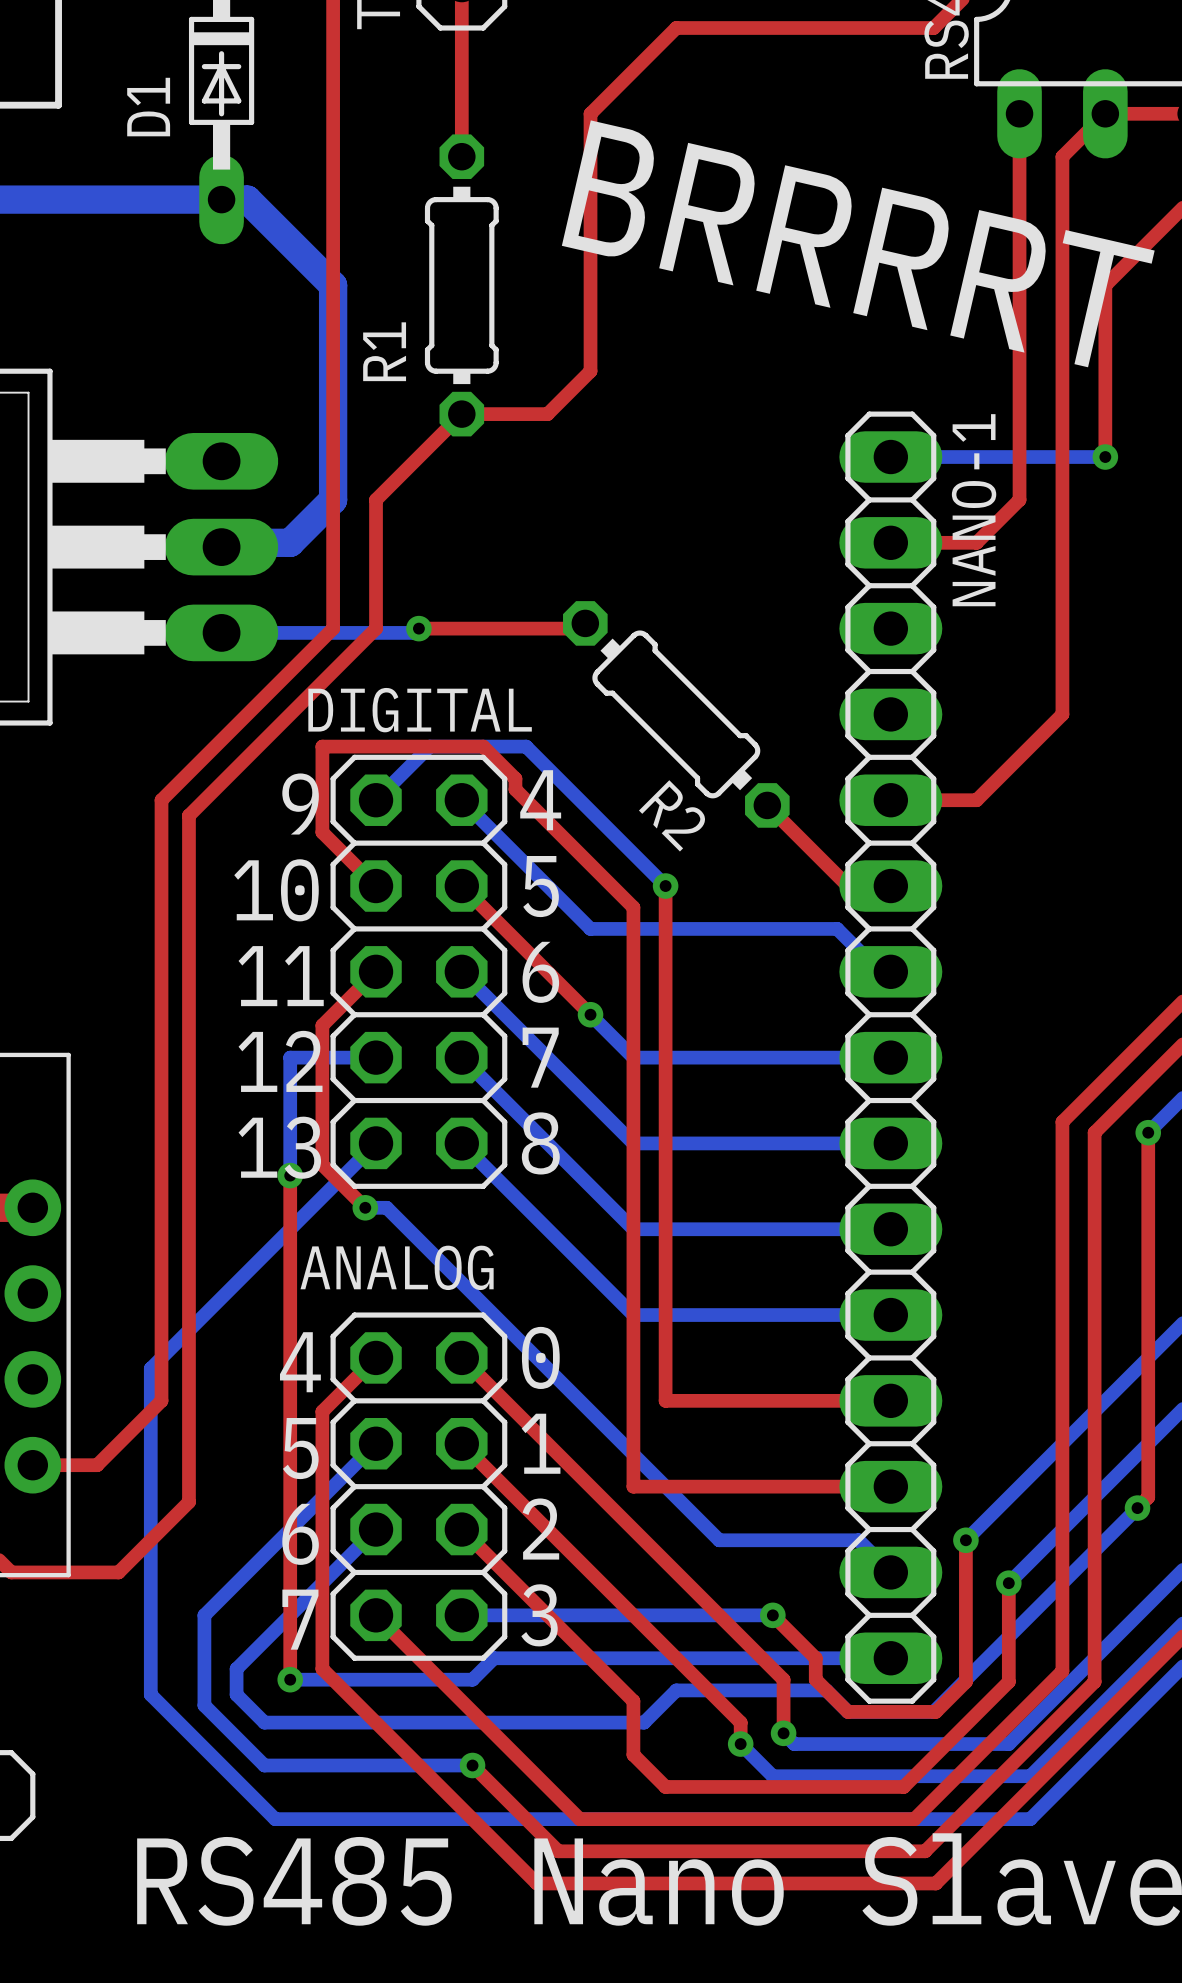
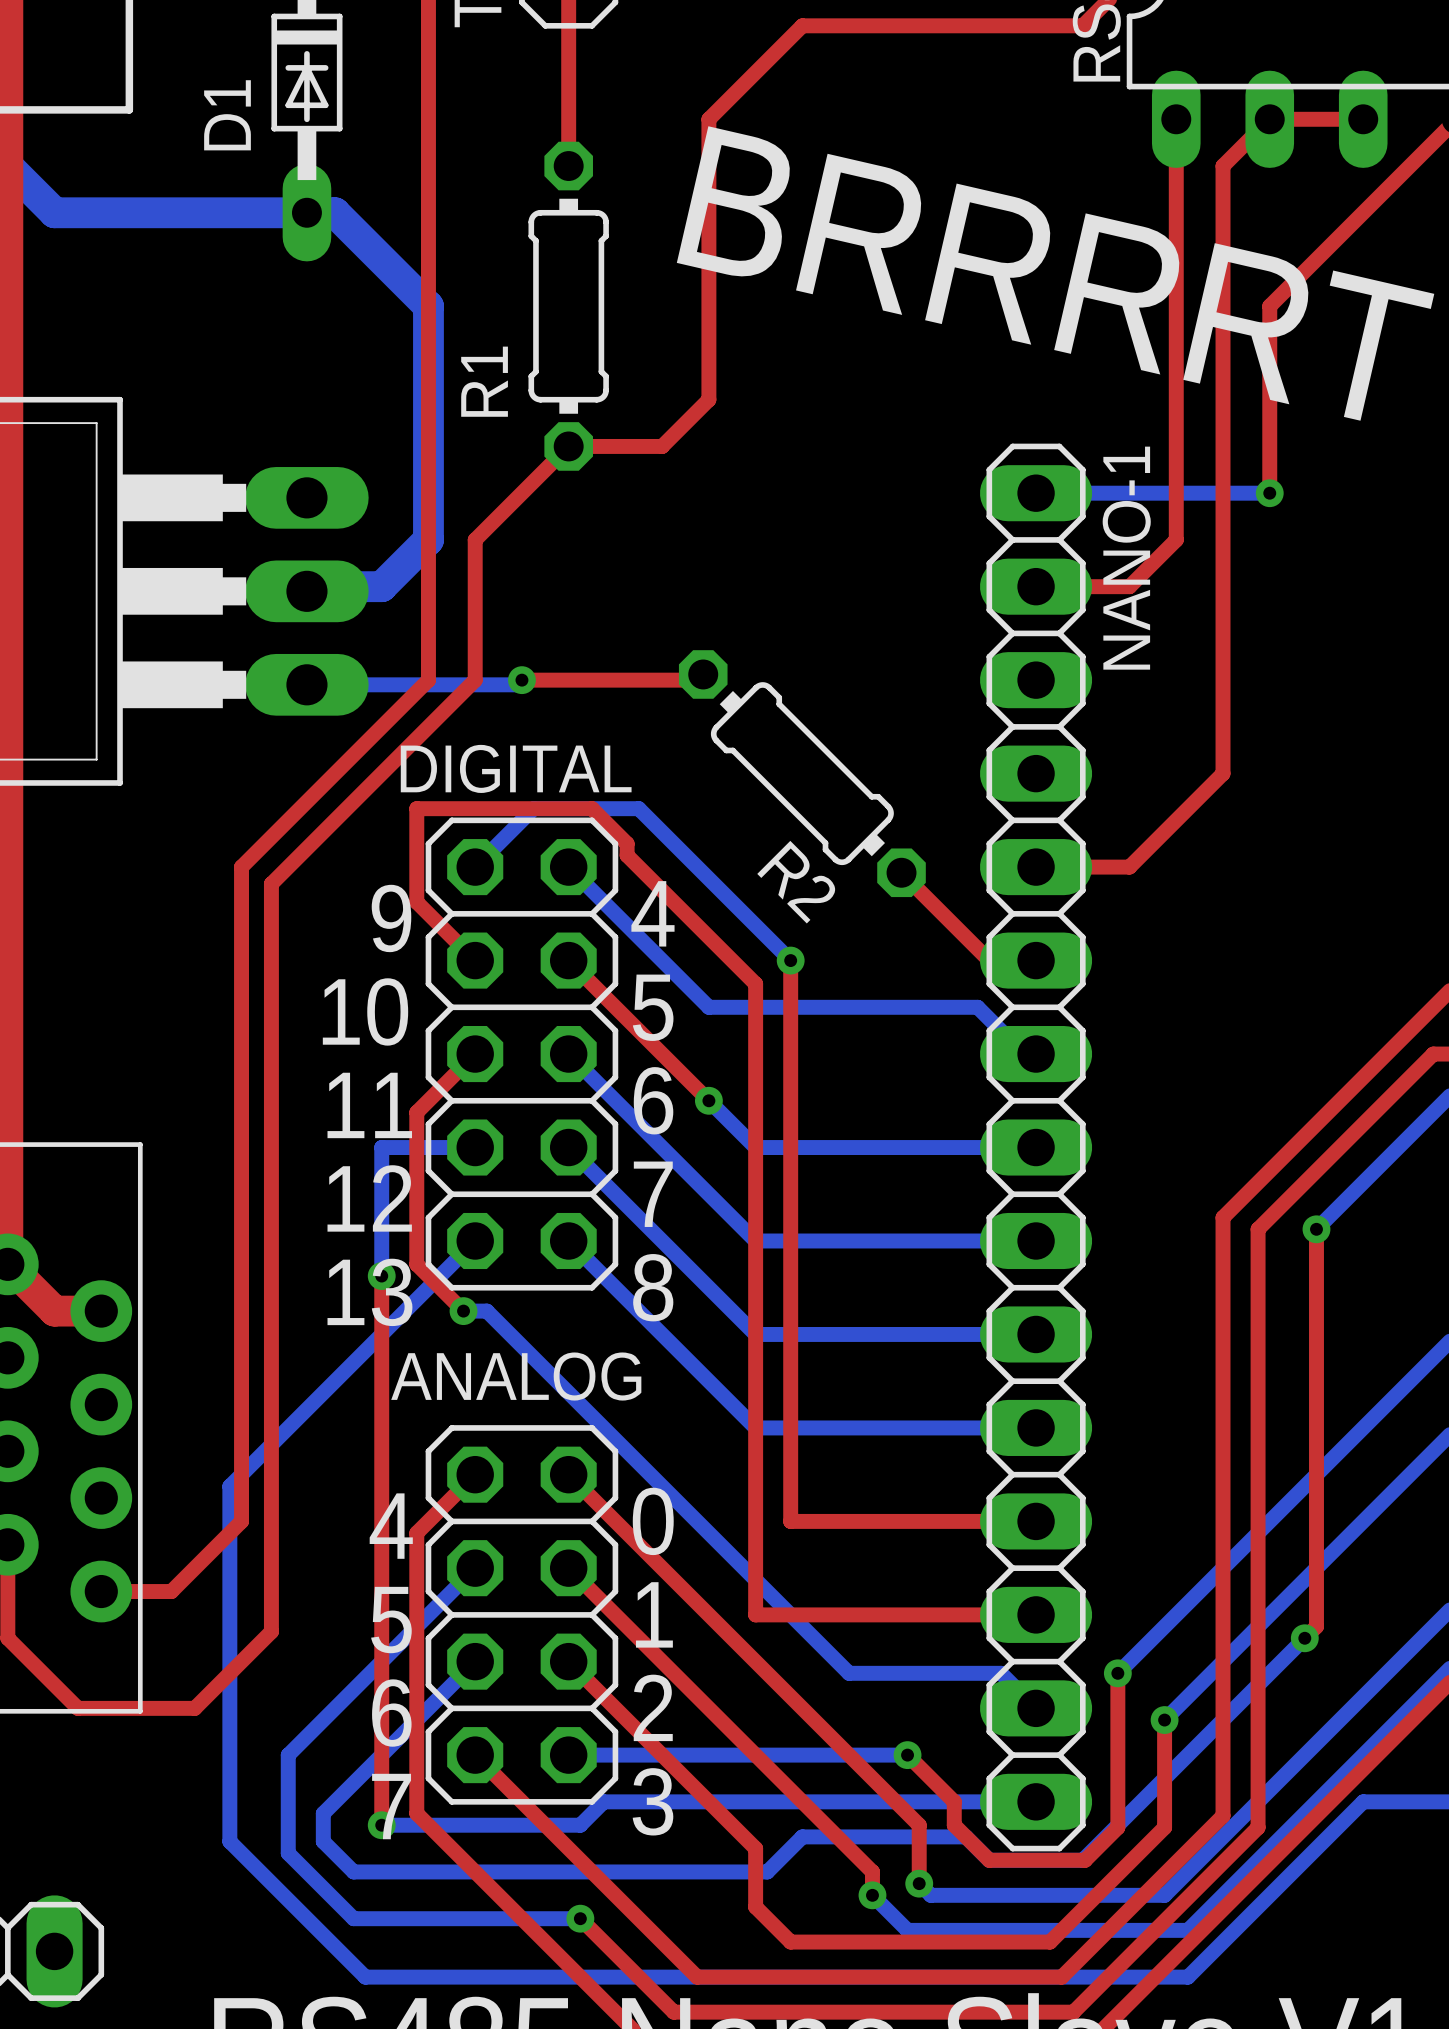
text position: 4 (540, 800) -> 4 (652, 913)
text position: 9 (300, 803) -> 9 (391, 918)
text position: 5 (541, 886) -> 5 (653, 1007)
text position: 10 (276, 890) -> 10 (365, 1011)
text position: 6 (540, 972) -> 6 (653, 1100)
text position: 11 (281, 976) -> 11 (369, 1105)
text position: 7 (540, 1057) -> 7 (653, 1194)
text position: 12 (280, 1061) -> 12 (369, 1198)
text position: 8 (540, 1143) -> 8 (653, 1287)
text position: 13 (279, 1147) -> 13 (369, 1292)
text position: 0 (540, 1357) -> 0 (653, 1521)
text position: 4 (300, 1362) -> 4 (391, 1526)
text position: 1 (541, 1443) -> 1 (654, 1614)
text position: 5 (300, 1448) -> 5 (391, 1620)
text position: 2 (540, 1529) -> 2 (653, 1707)
text position: 6 (300, 1534) -> 6 (391, 1713)
text position: 3 (539, 1615) -> 3 (653, 1801)
text position: 7 (300, 1619) -> 7 (391, 1806)

